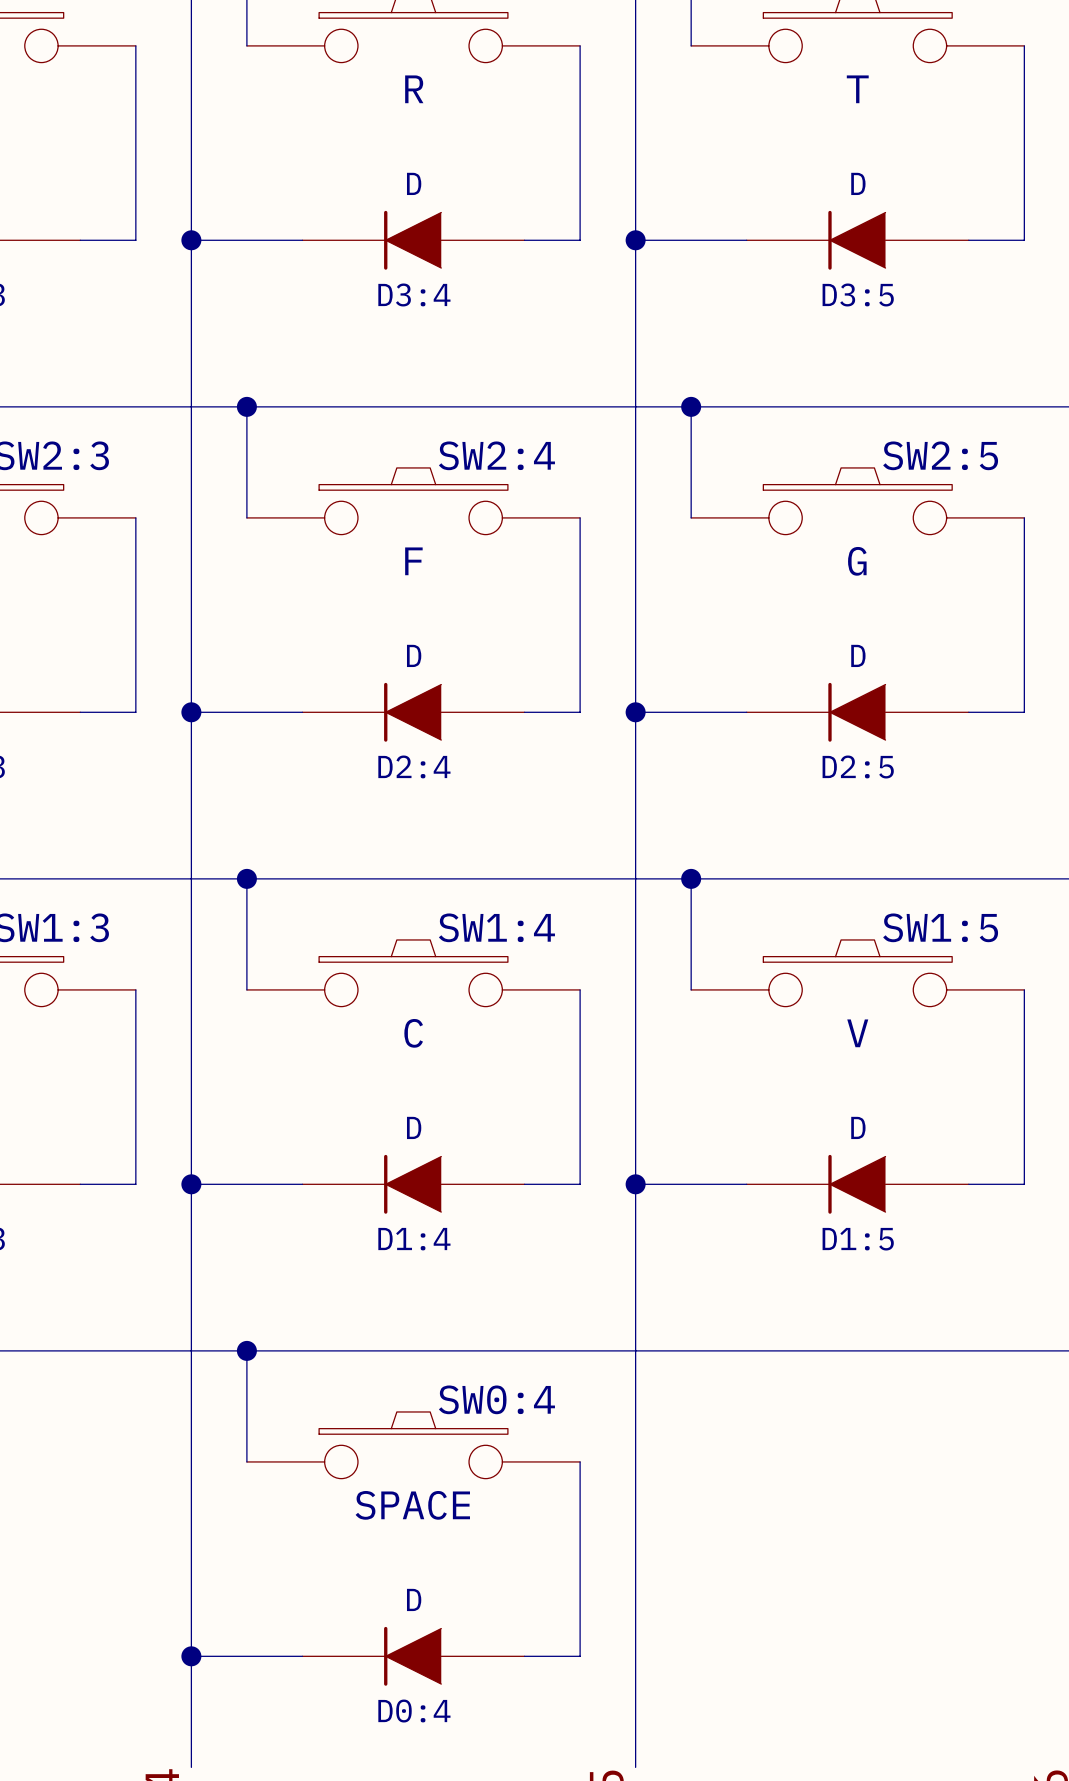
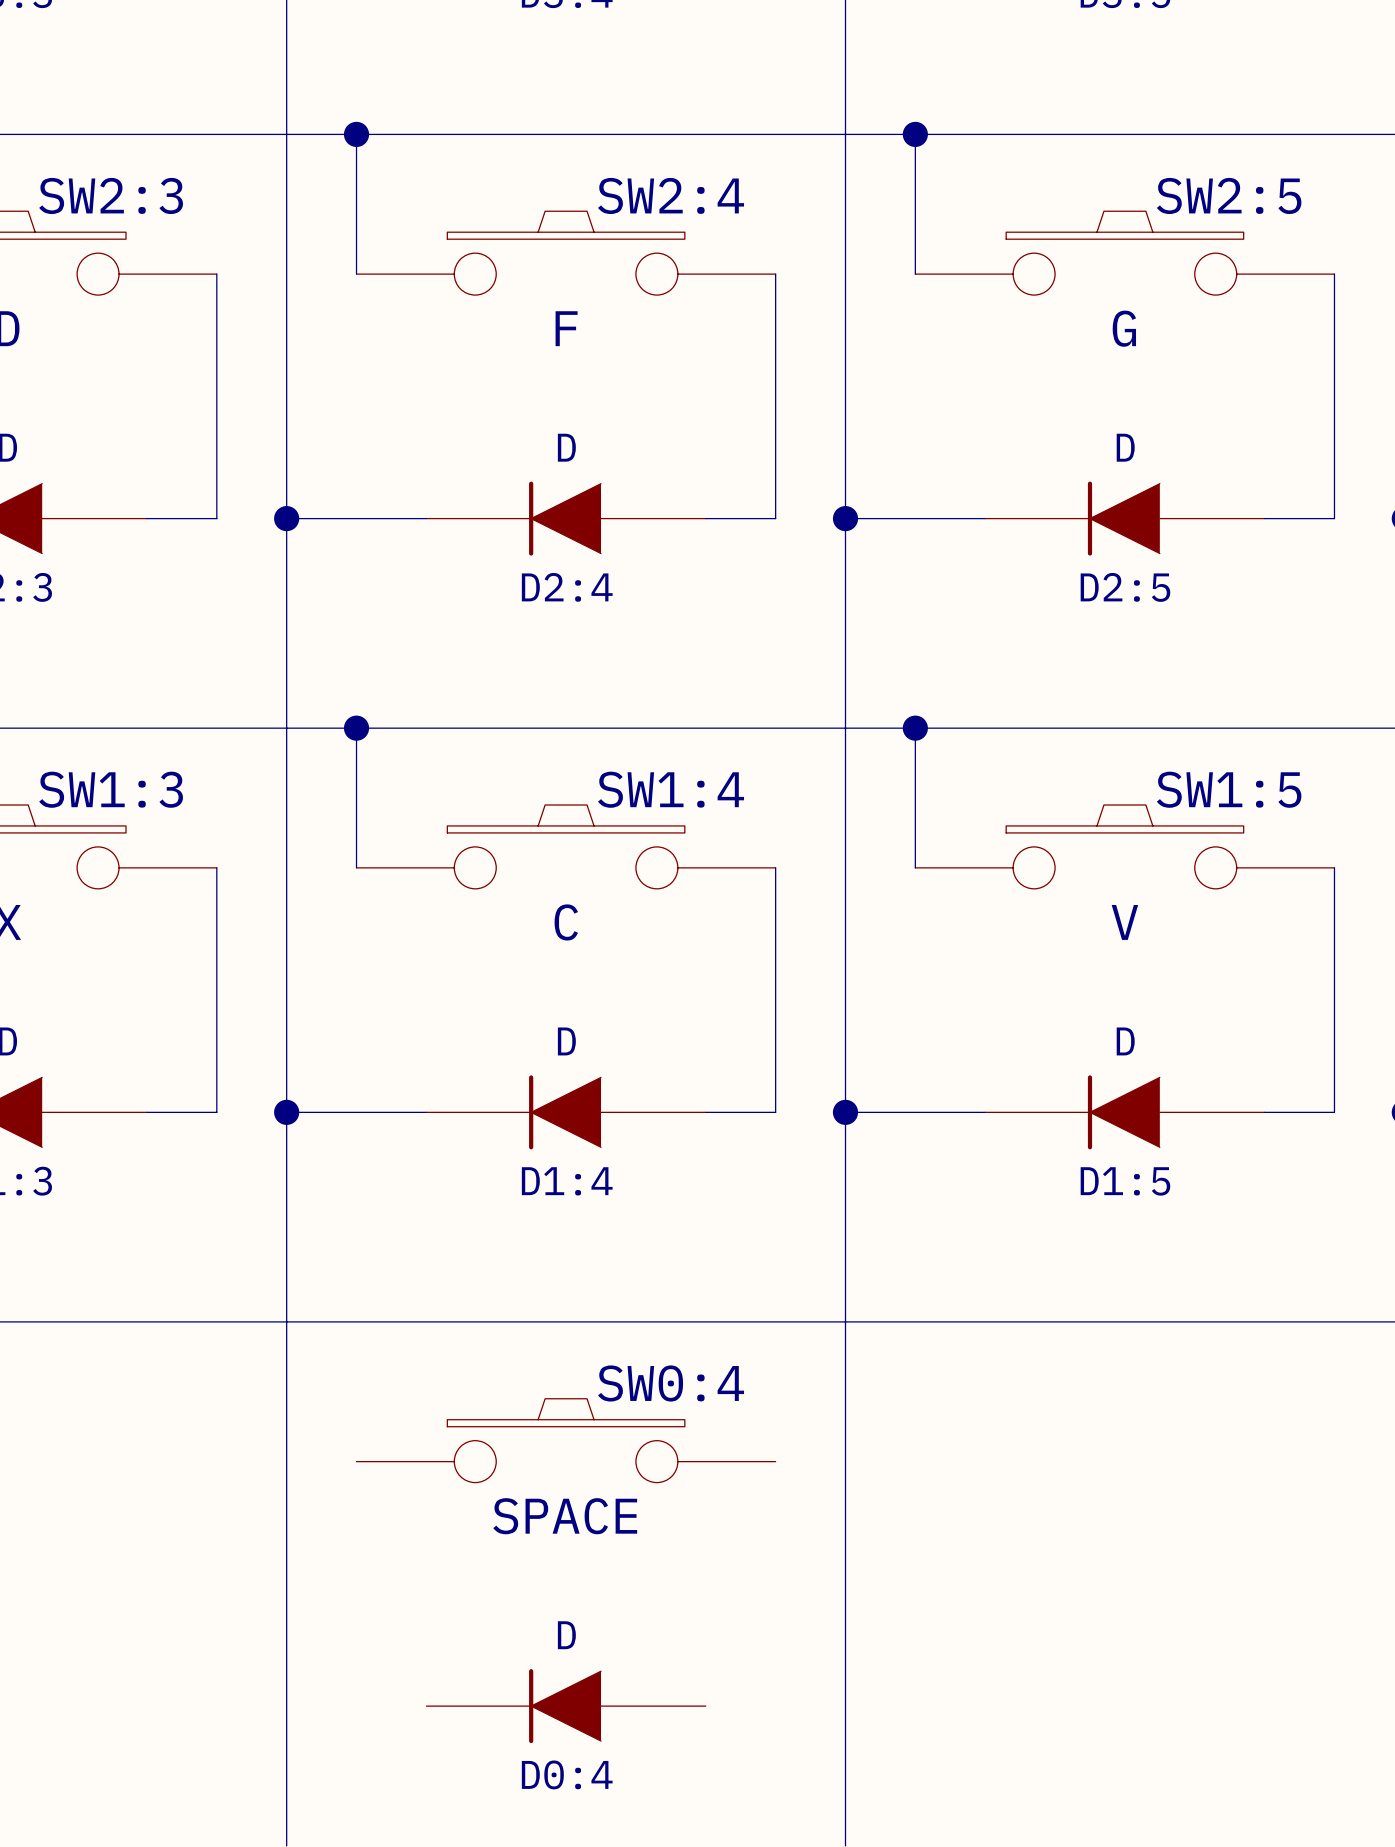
wire: (246, 1350) (246, 1461) -> none
junction: (246, 1350) -> none
wire: (580, 1461) (580, 1656) (524, 1656) -> none
wire: (191, 1656) (302, 1656) -> none
junction: (191, 1656) -> none

